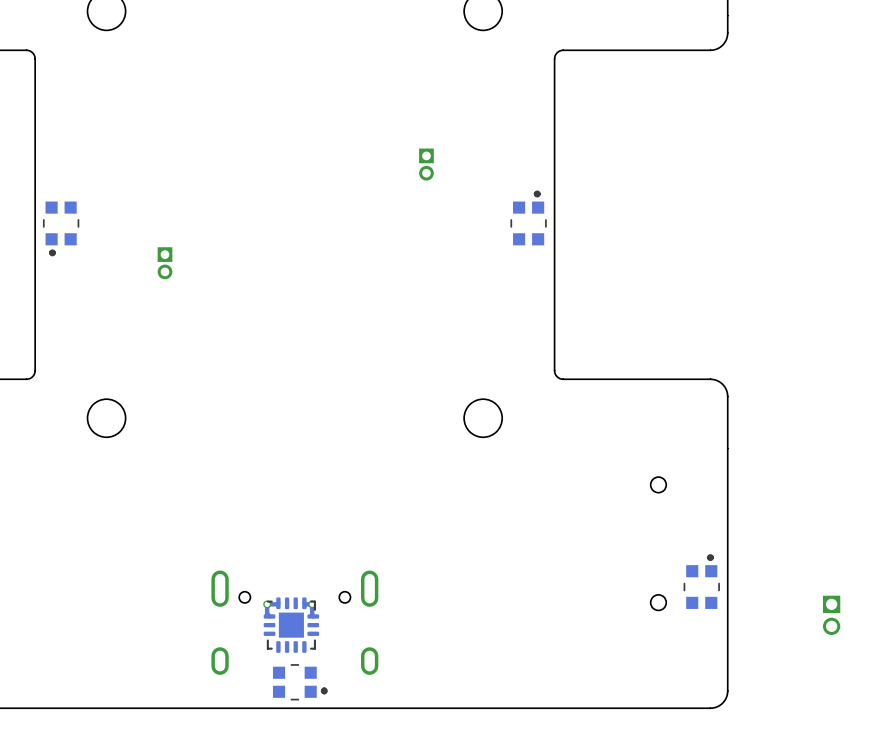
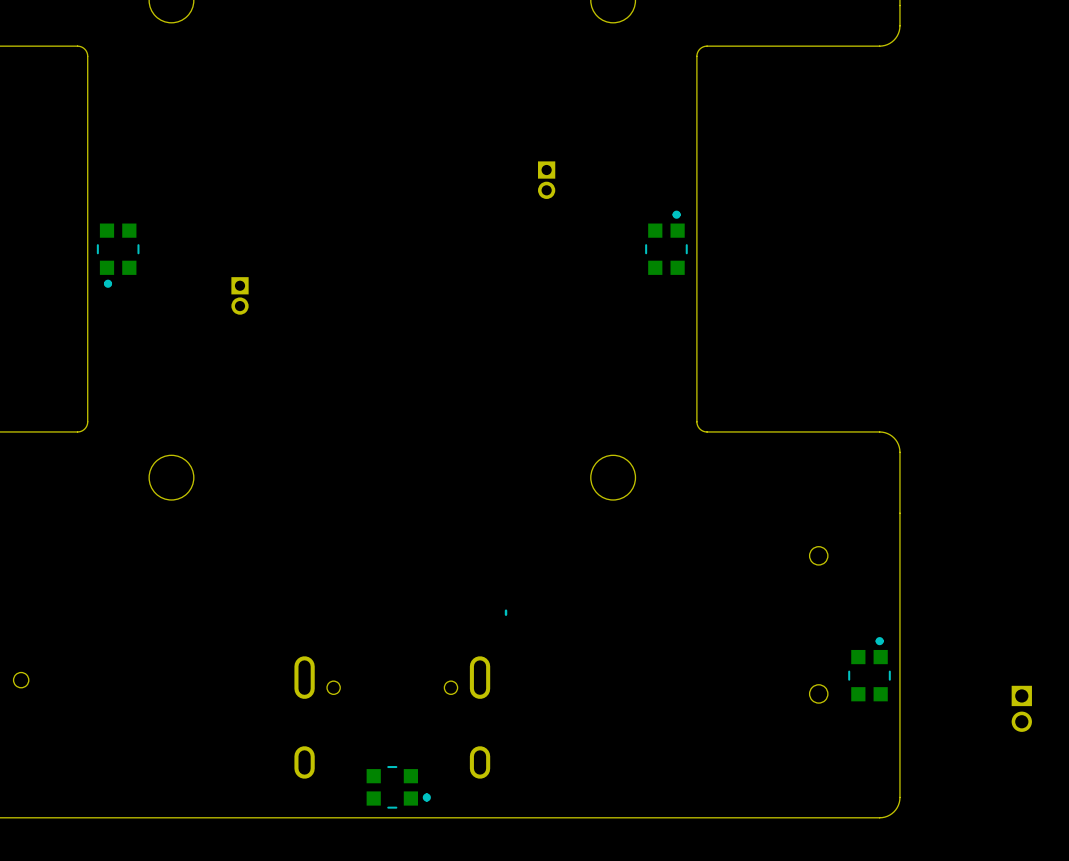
line: none -> (506, 610) (506, 614)
track: (278, 603) (267, 604) (267, 614) (269, 616) -> none
track: (304, 603) (312, 604) (313, 616) -> none
via: (267, 604) -> none
via: (312, 604) -> none
part: (291, 625) -> none

